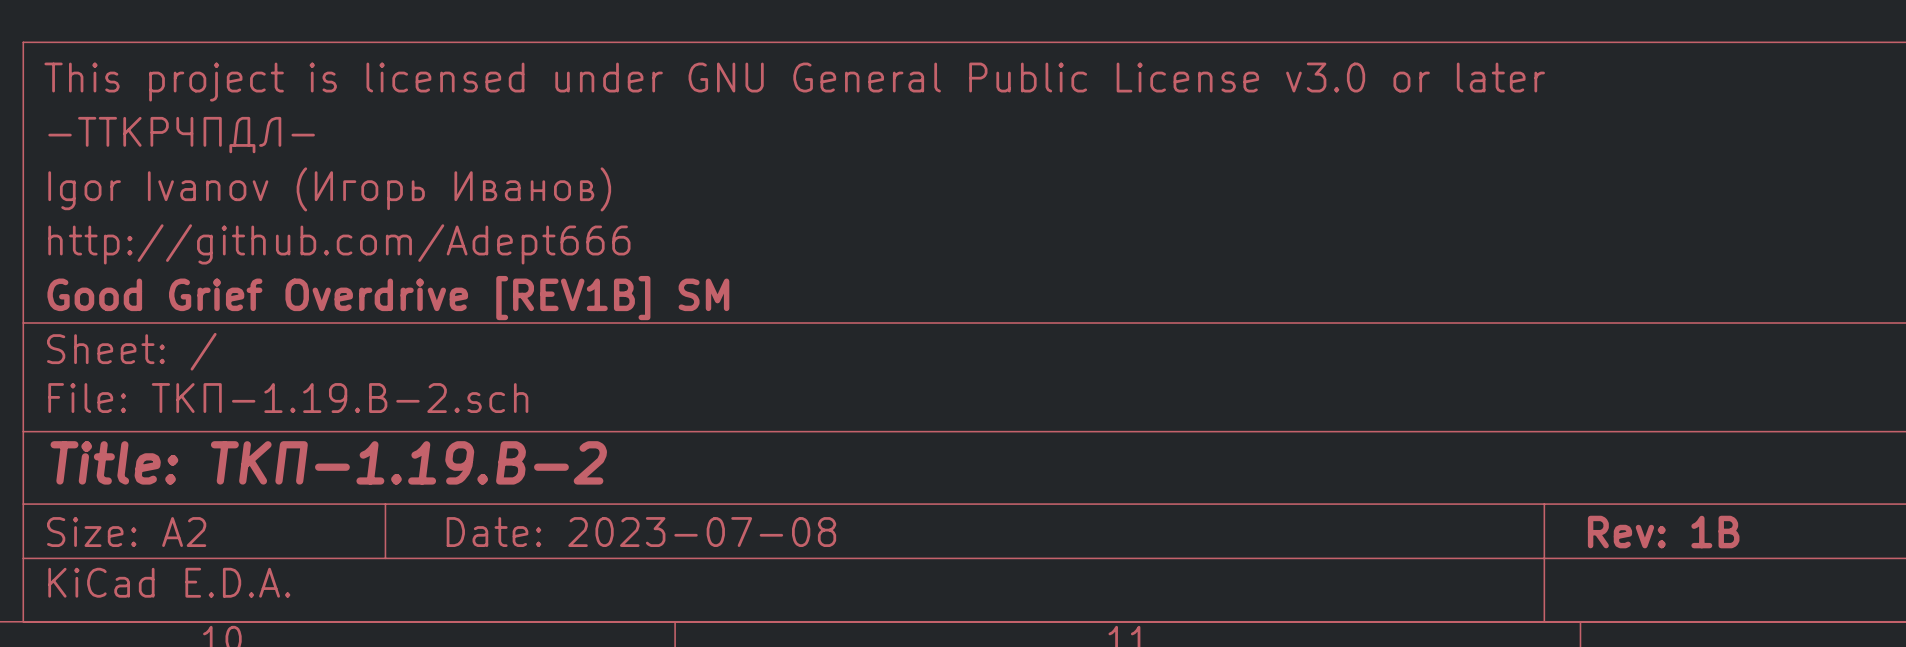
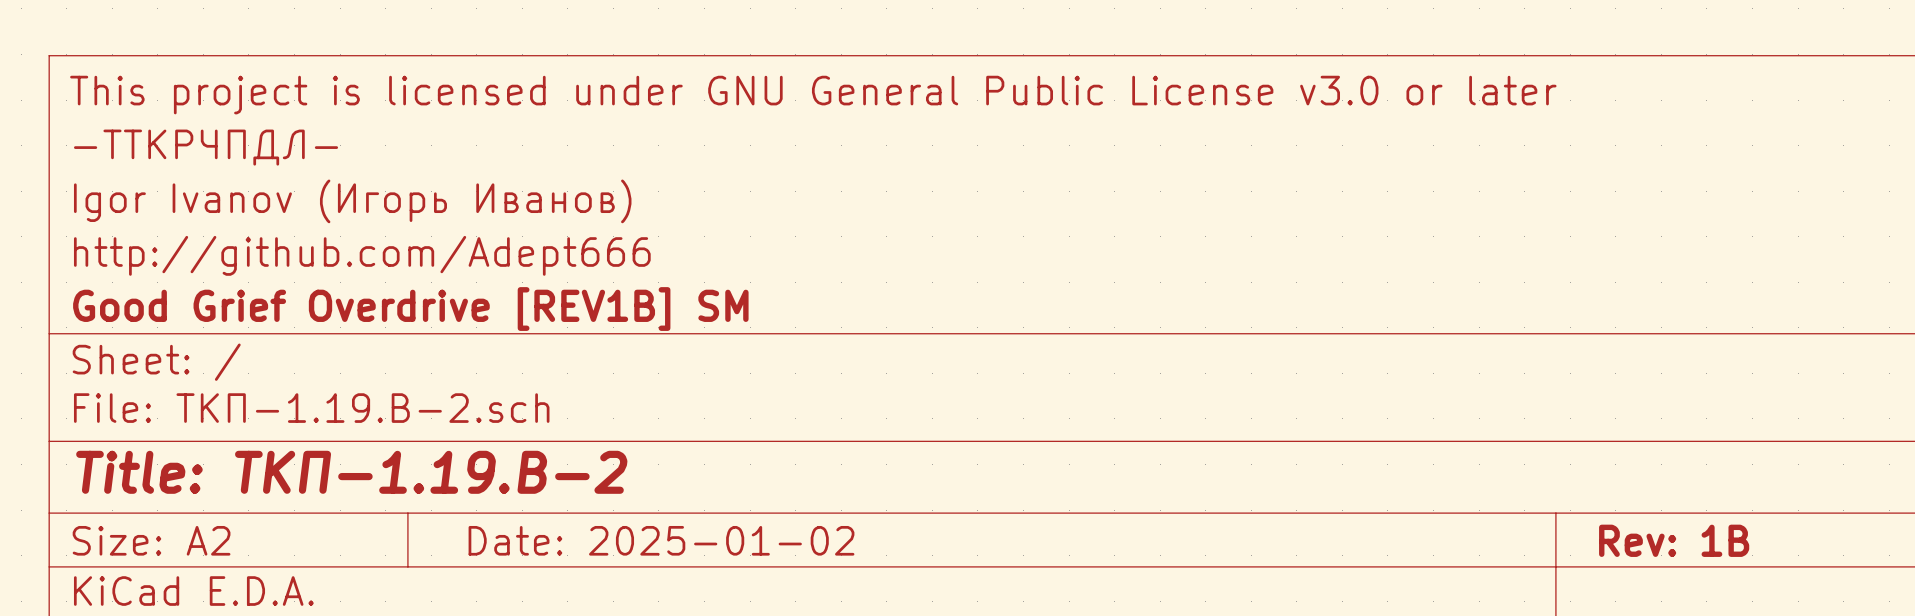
title block: Date: 2023-07-08 (641, 532) -> Date: 2025-01-02 (661, 540)

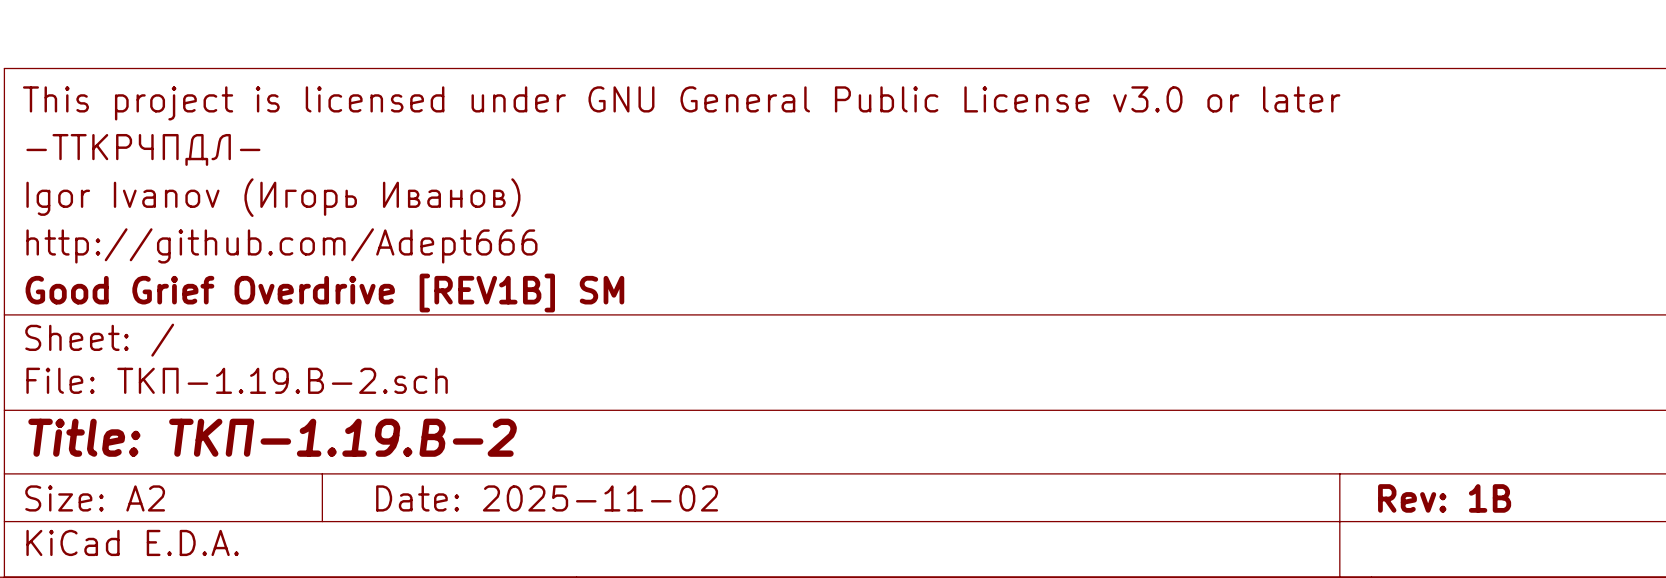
title block: Date: 2025-01-02 (661, 540) -> Date: 2025-11-02 (547, 498)

